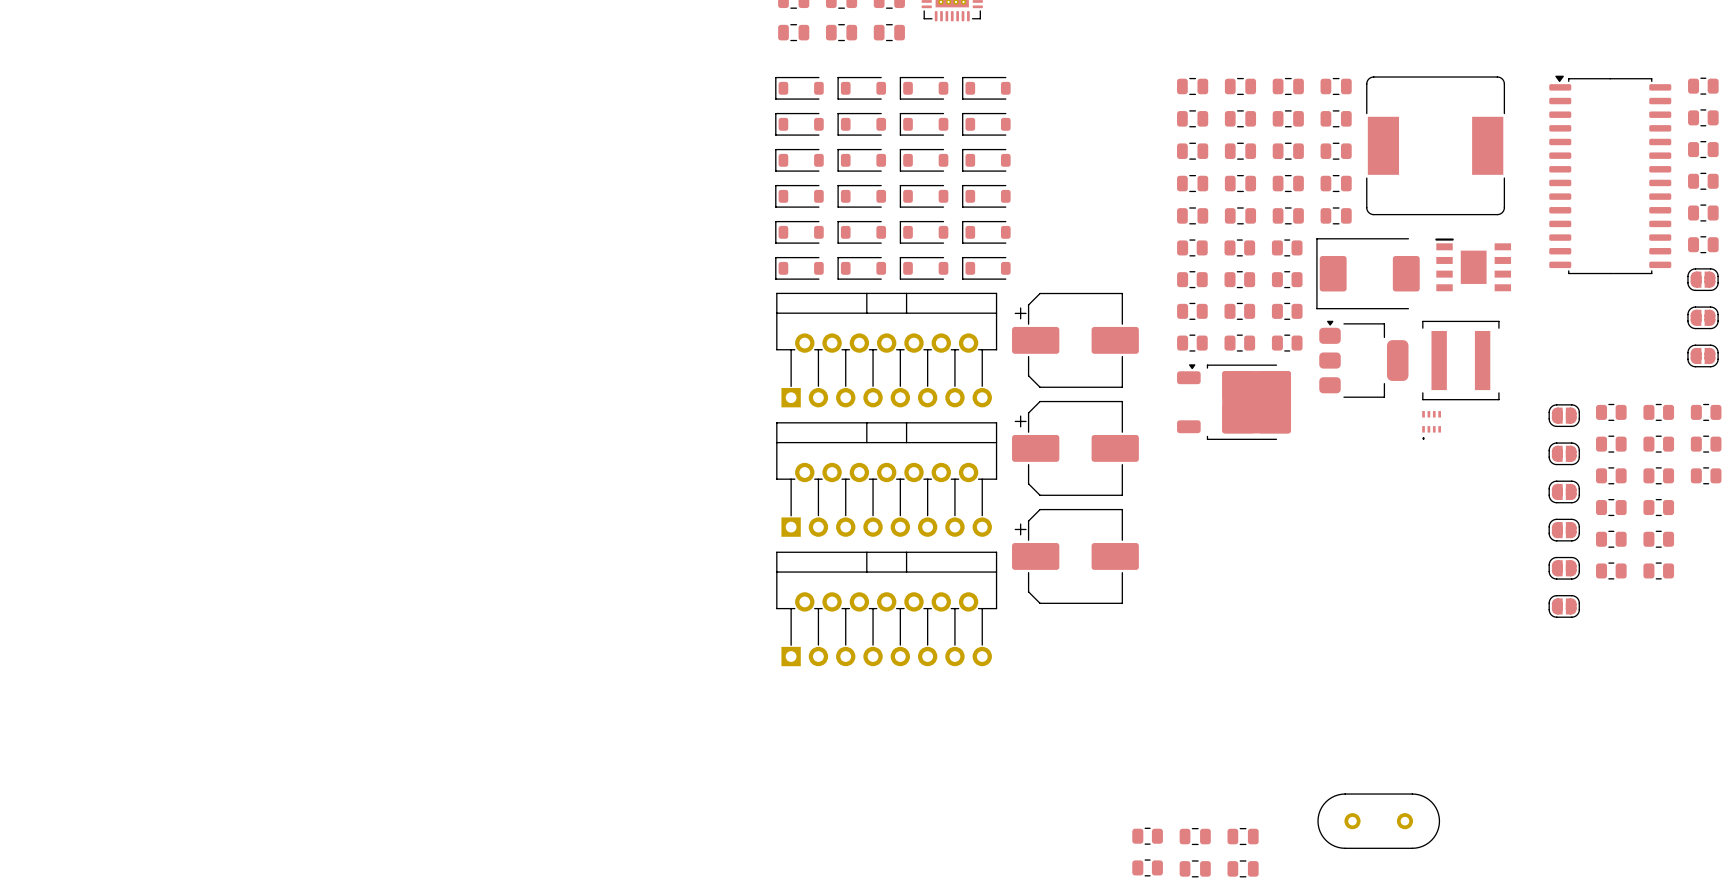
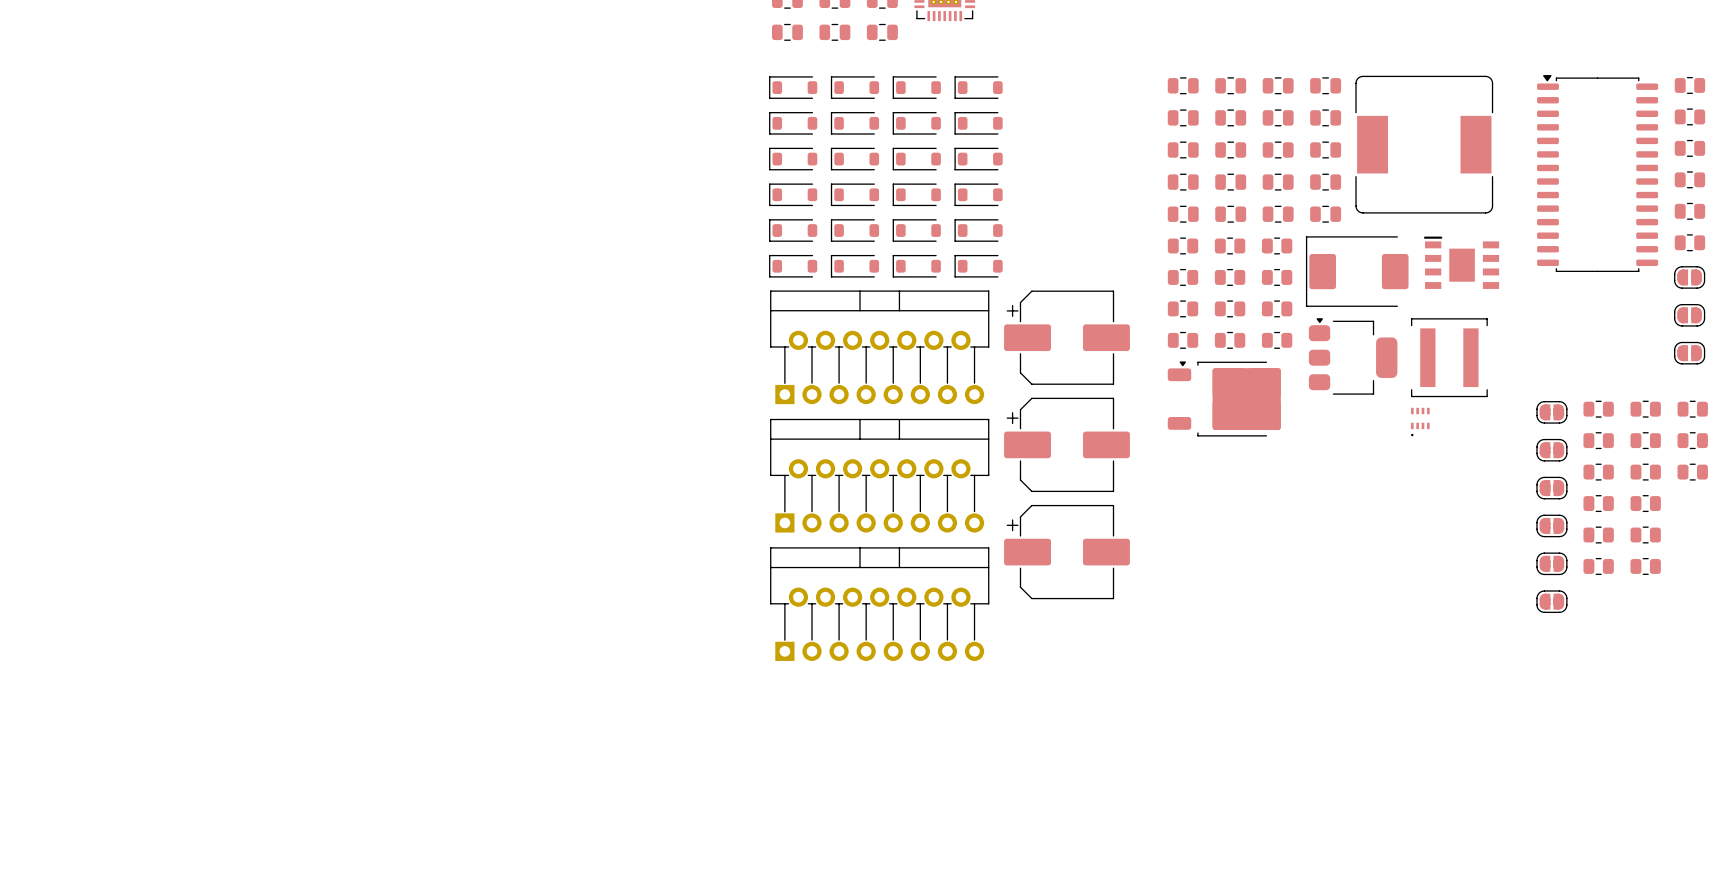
part: (1378, 821) -> none
part: (1147, 836) -> none
part: (1195, 836) -> none
part: (1243, 836) -> none
part: (1147, 867) -> none
part: (1195, 868) -> none
part: (1243, 868) -> none

